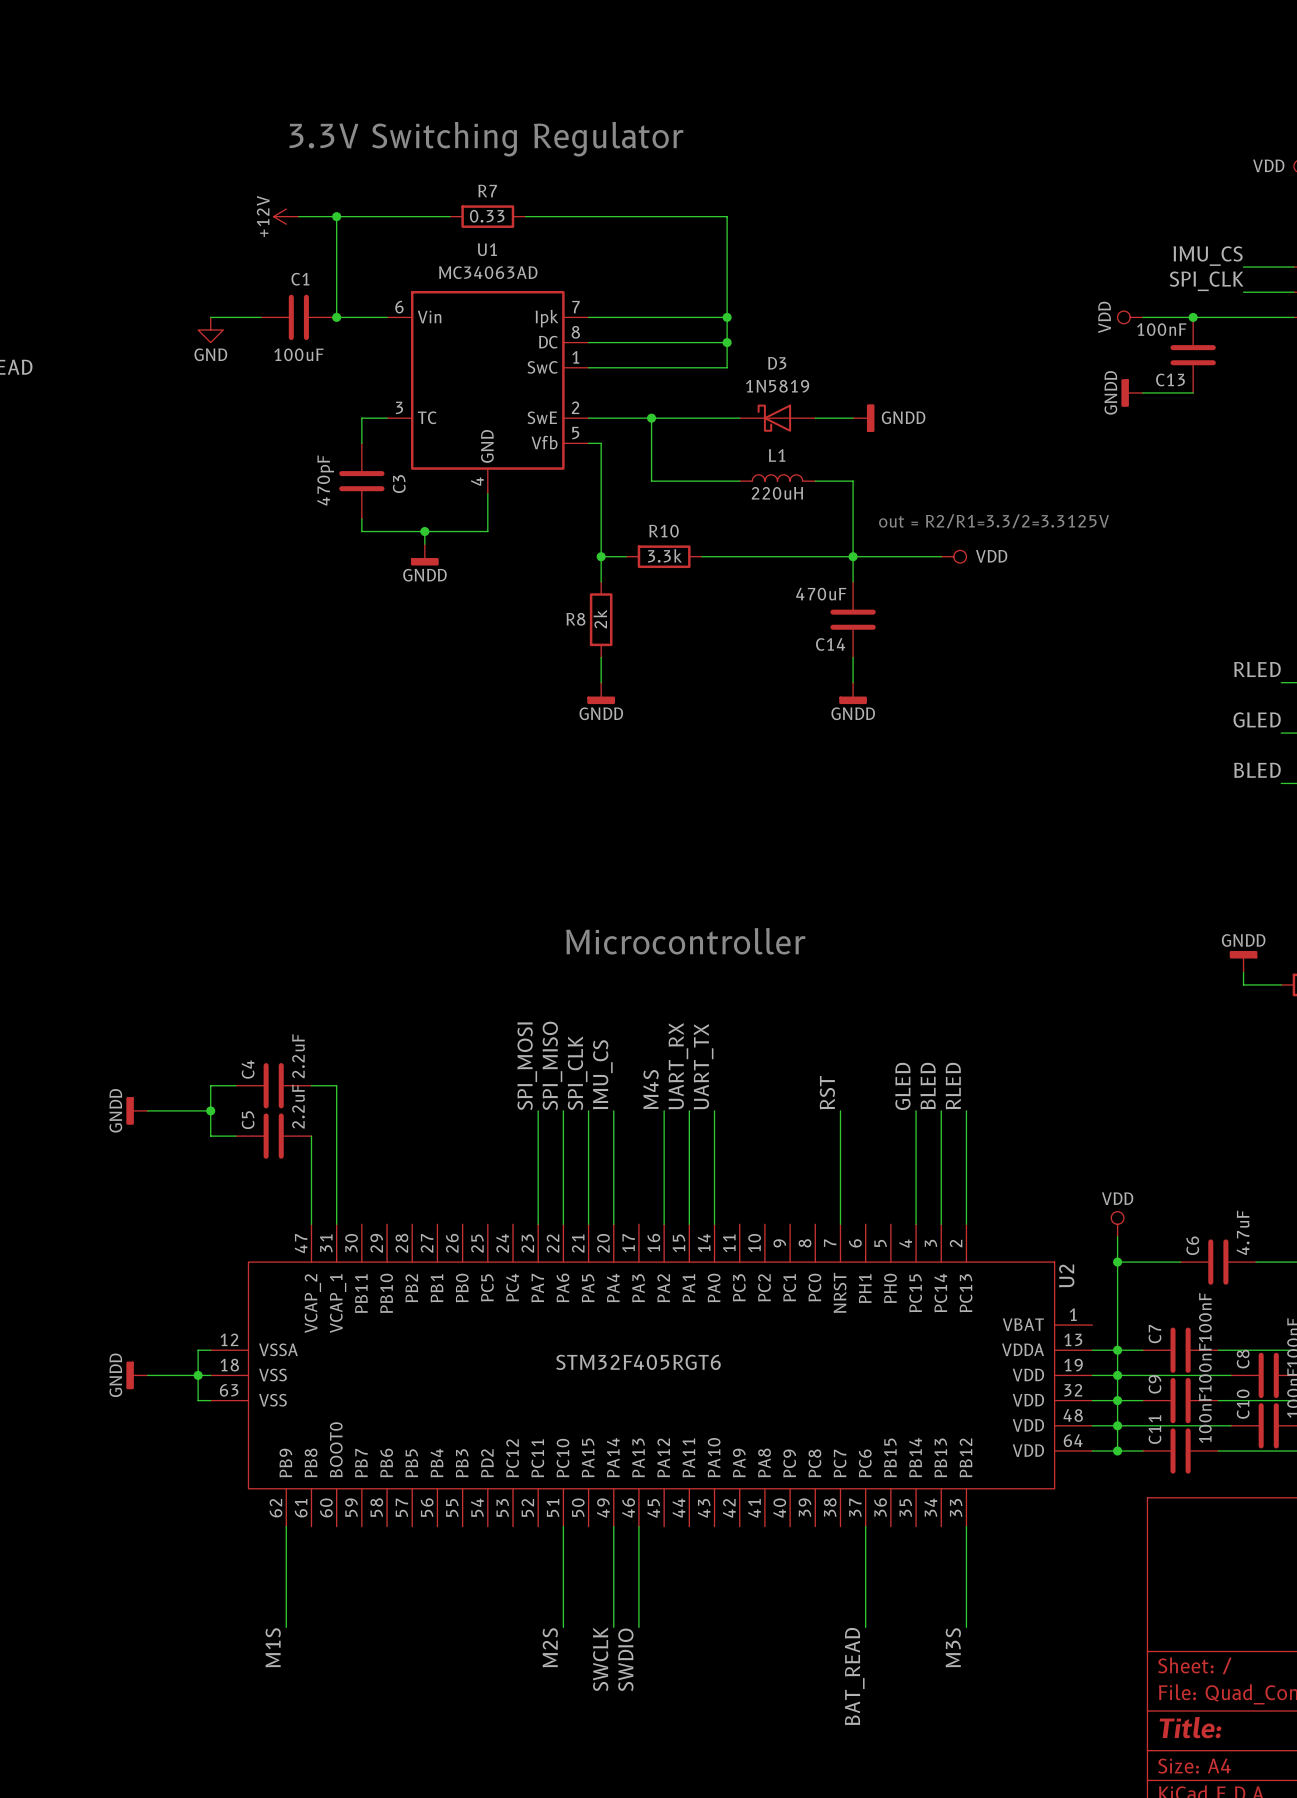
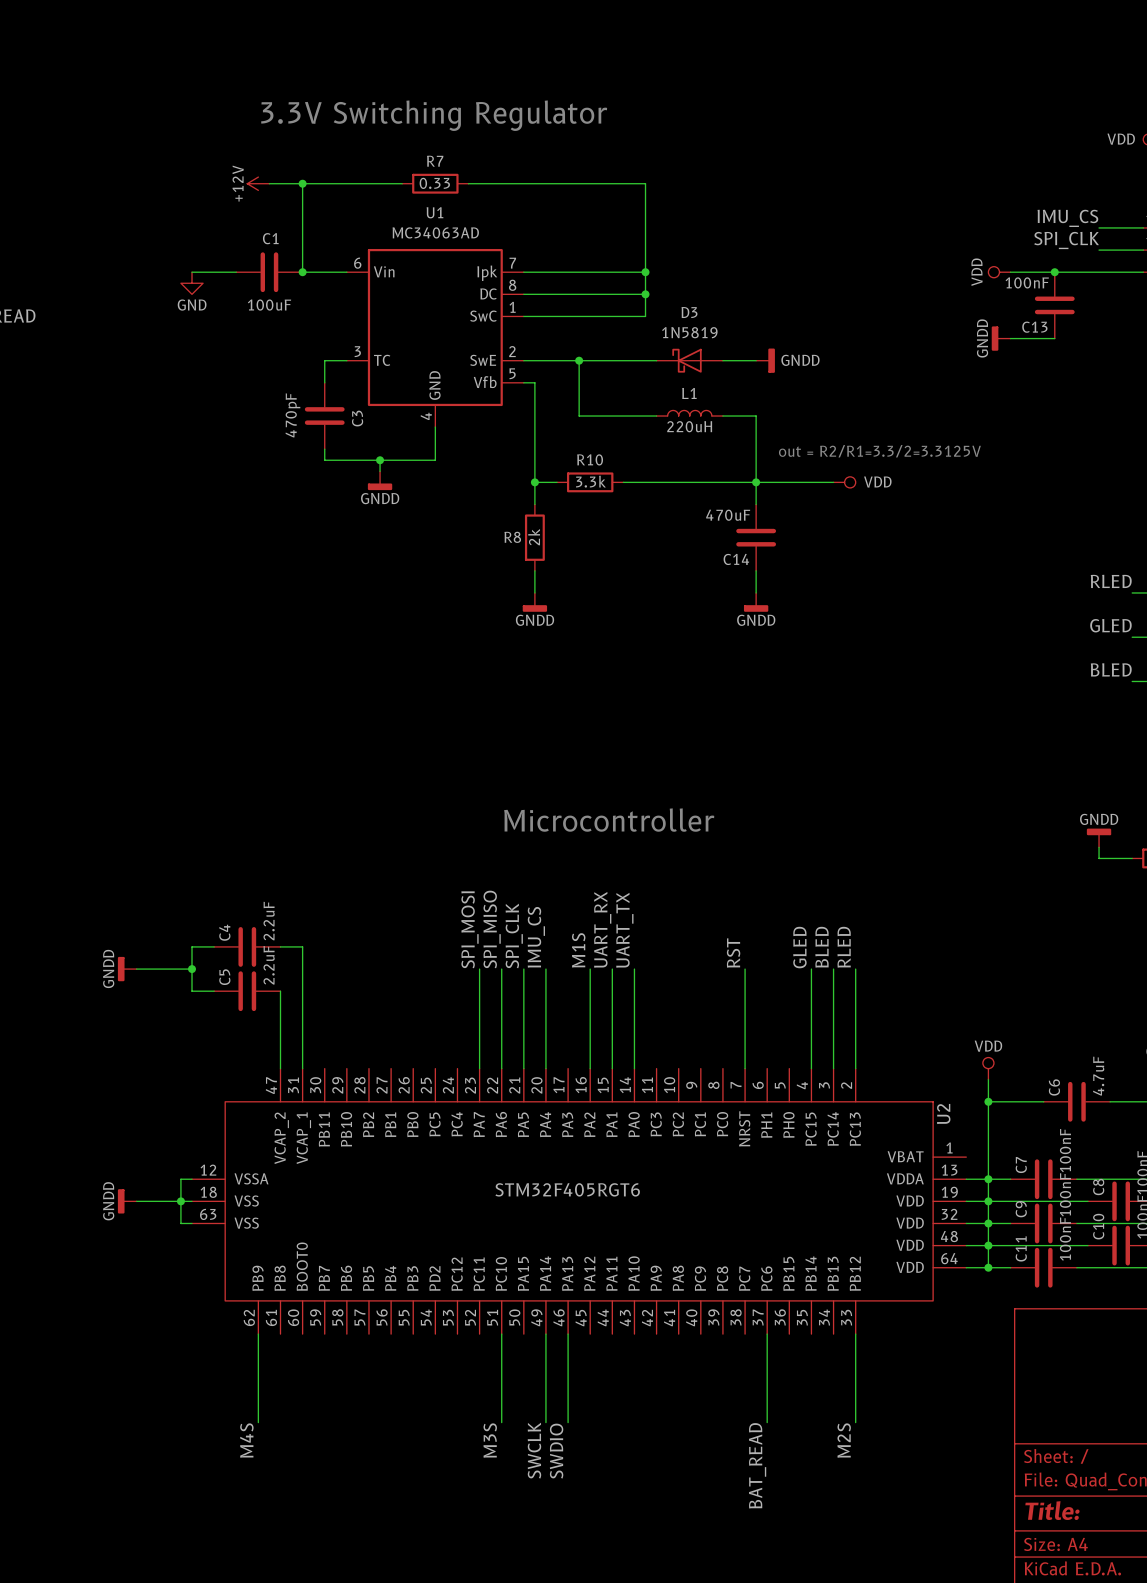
label: M4S (651, 1089) -> M1S (578, 950)
label: M1S (273, 1647) -> M4S (246, 1440)
label: M2S (550, 1647) -> M3S (490, 1440)
label: M3S (953, 1647) -> M2S (844, 1440)

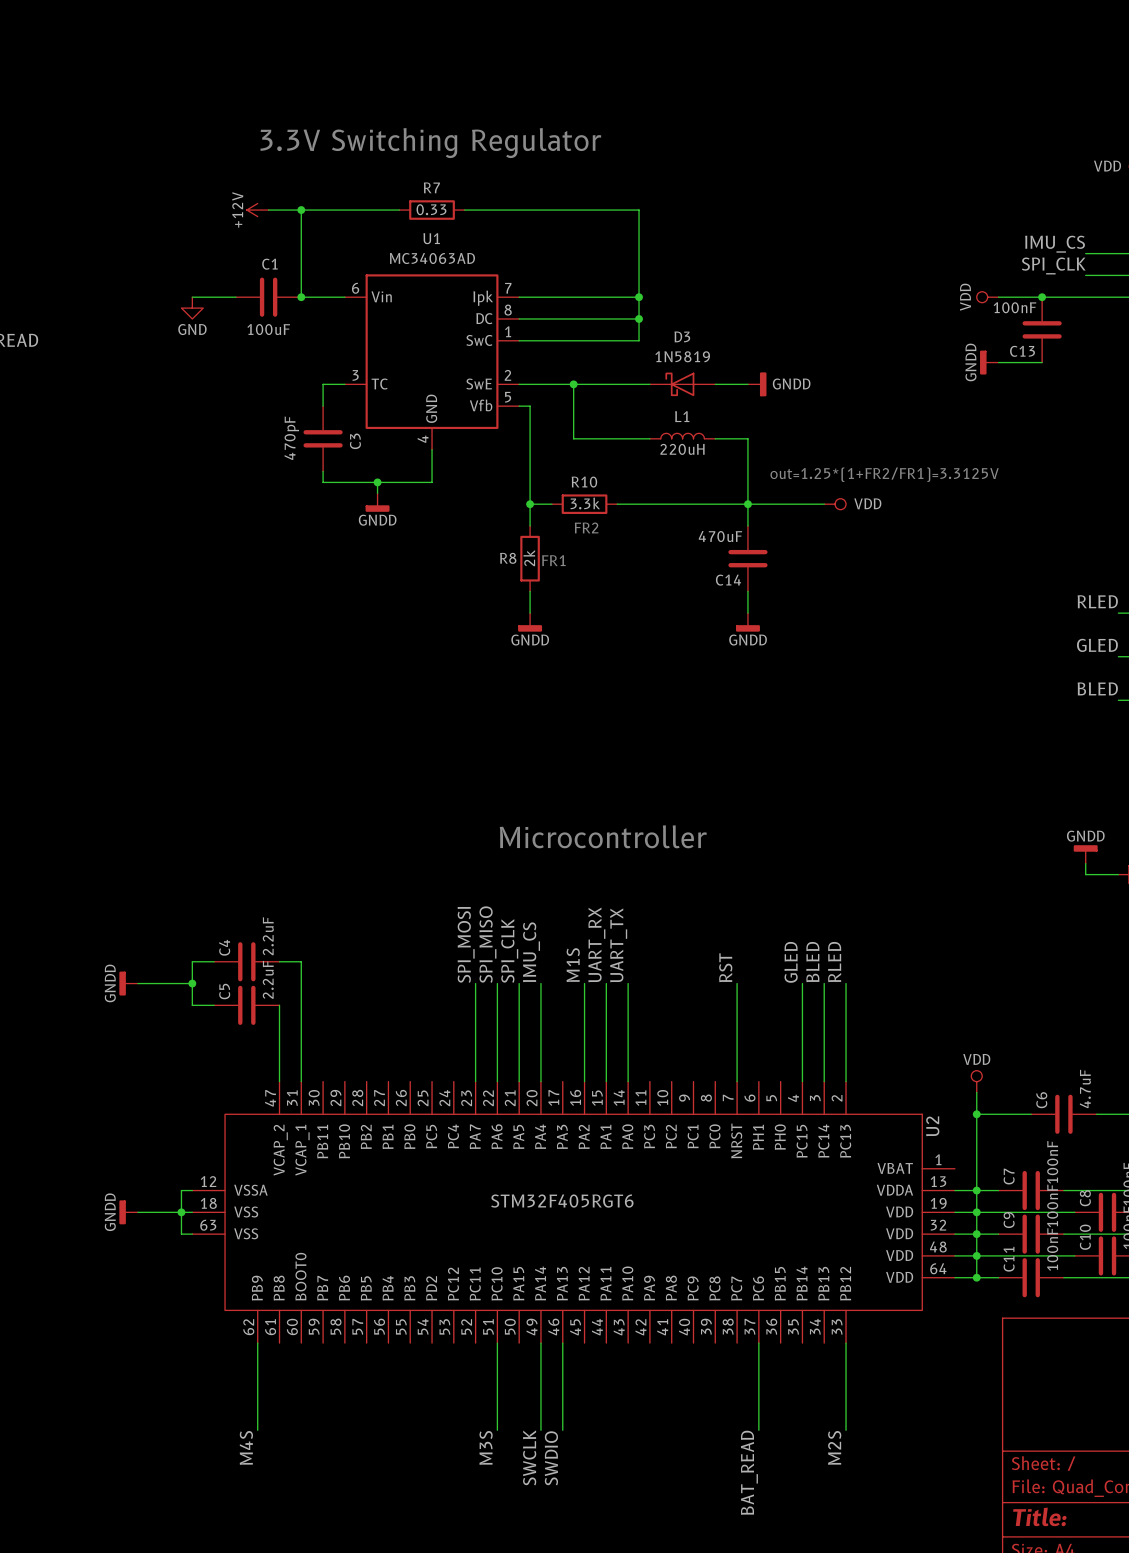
text: out = R2/R1=3.3/2=3.3125V (879, 451) -> out=1.25*(1+FR2/FR1)=3.3125V (884, 474)
text: none -> FR2 (586, 527)
text: none -> FR1 (553, 560)

